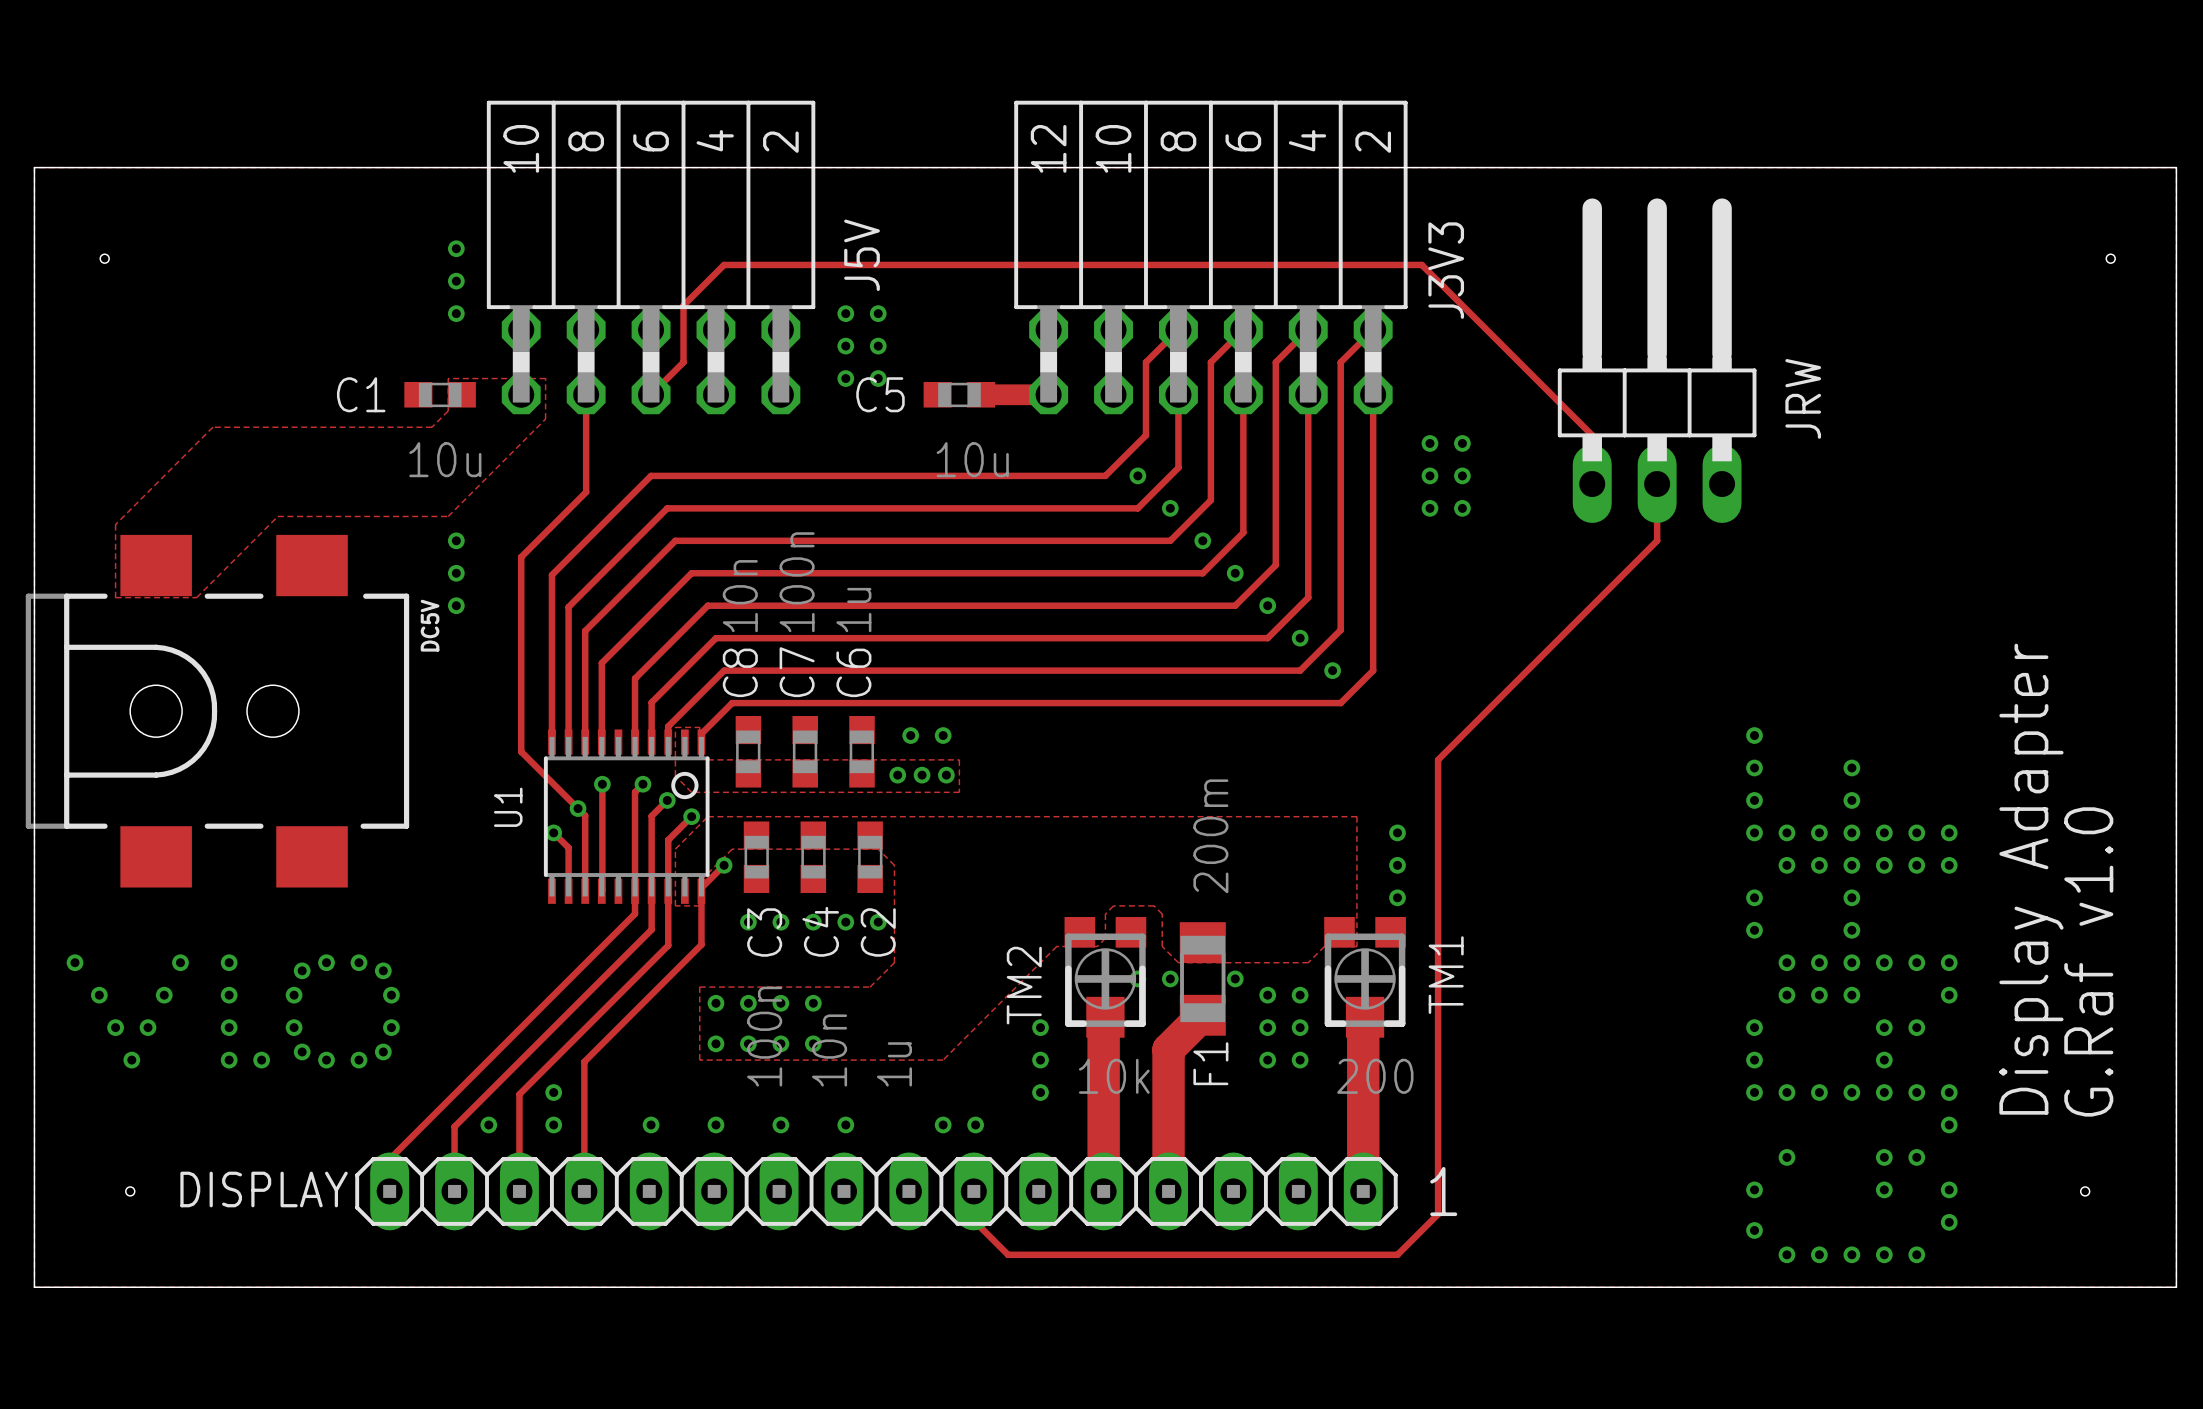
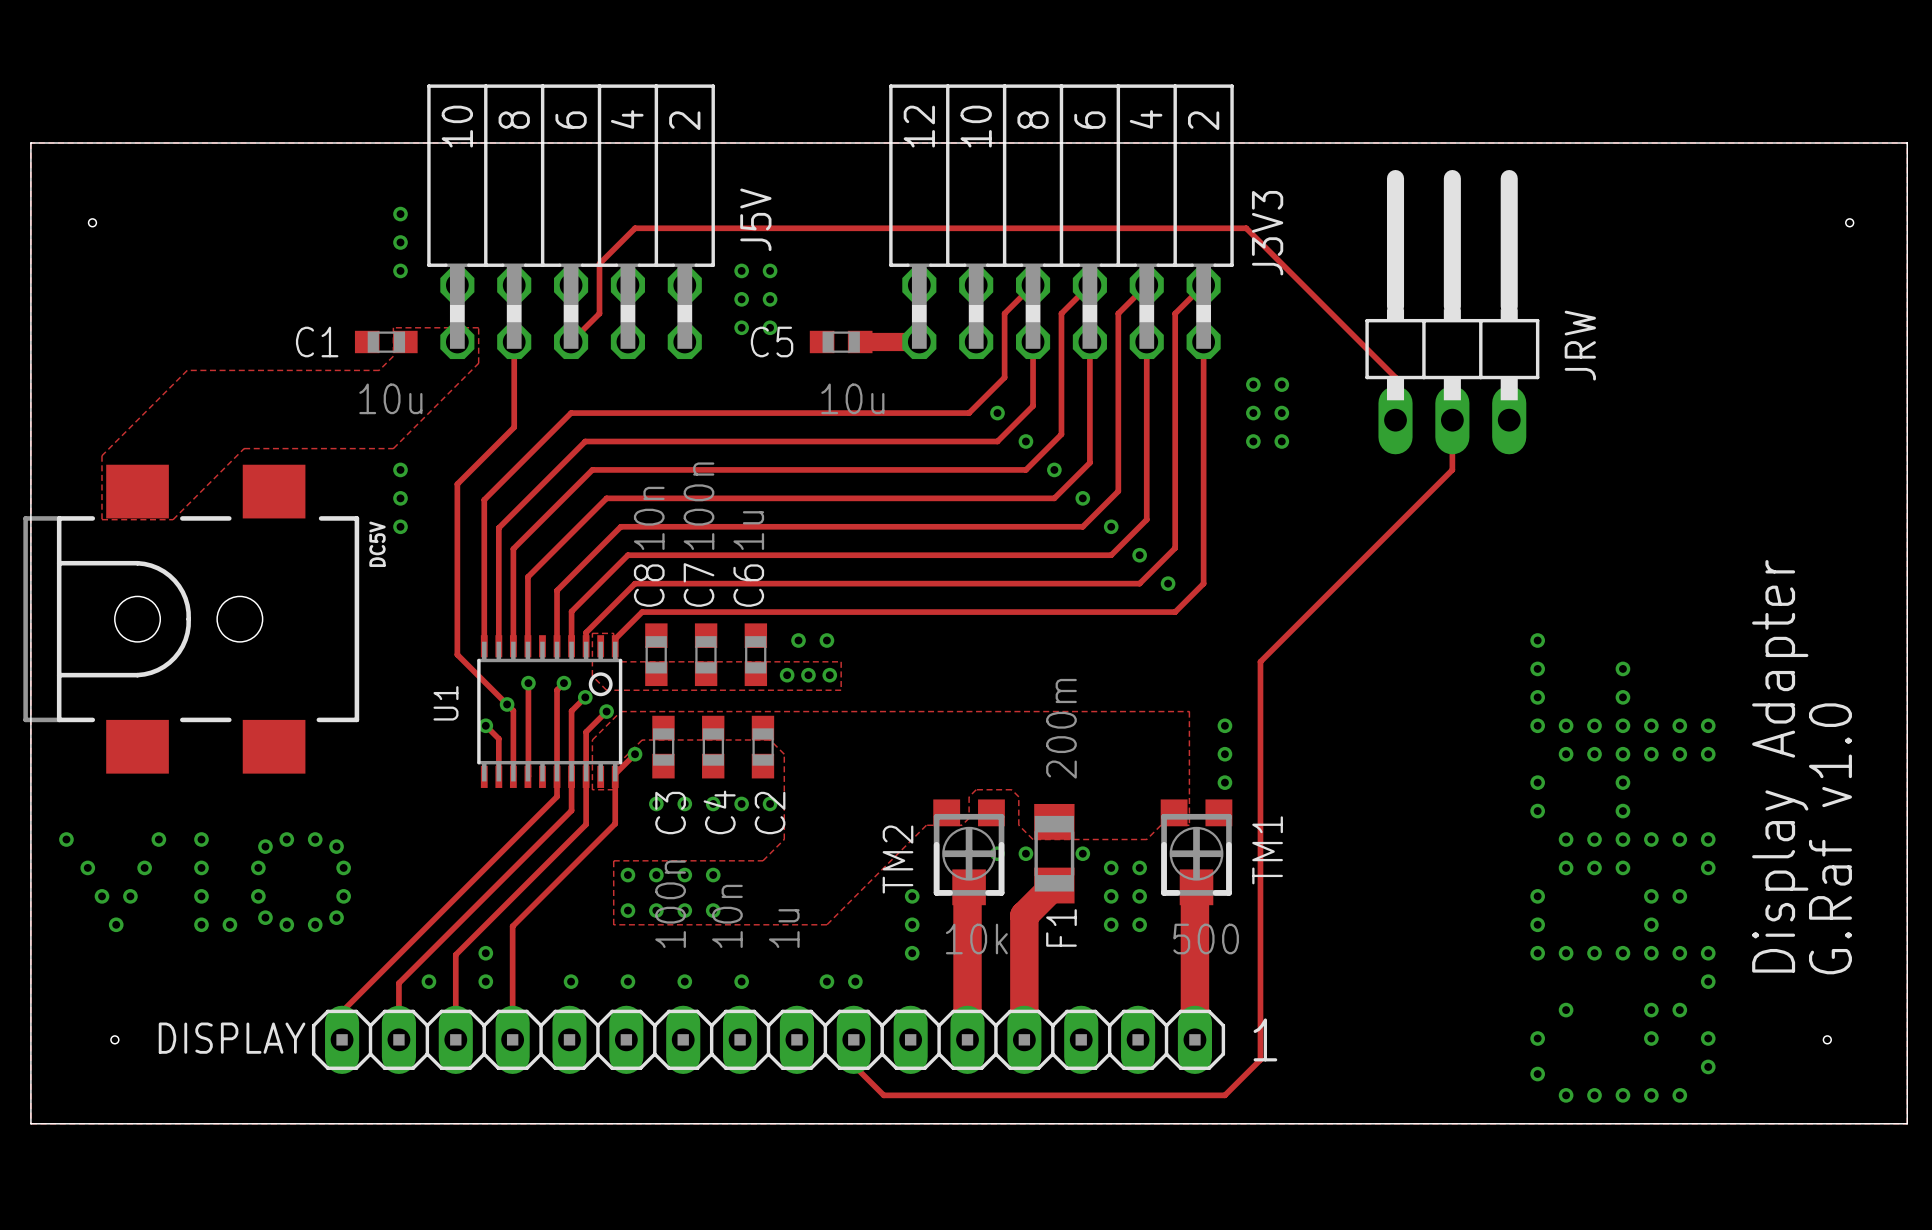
TM1 value: 200 (1375, 1076) -> 500 (1206, 939)

